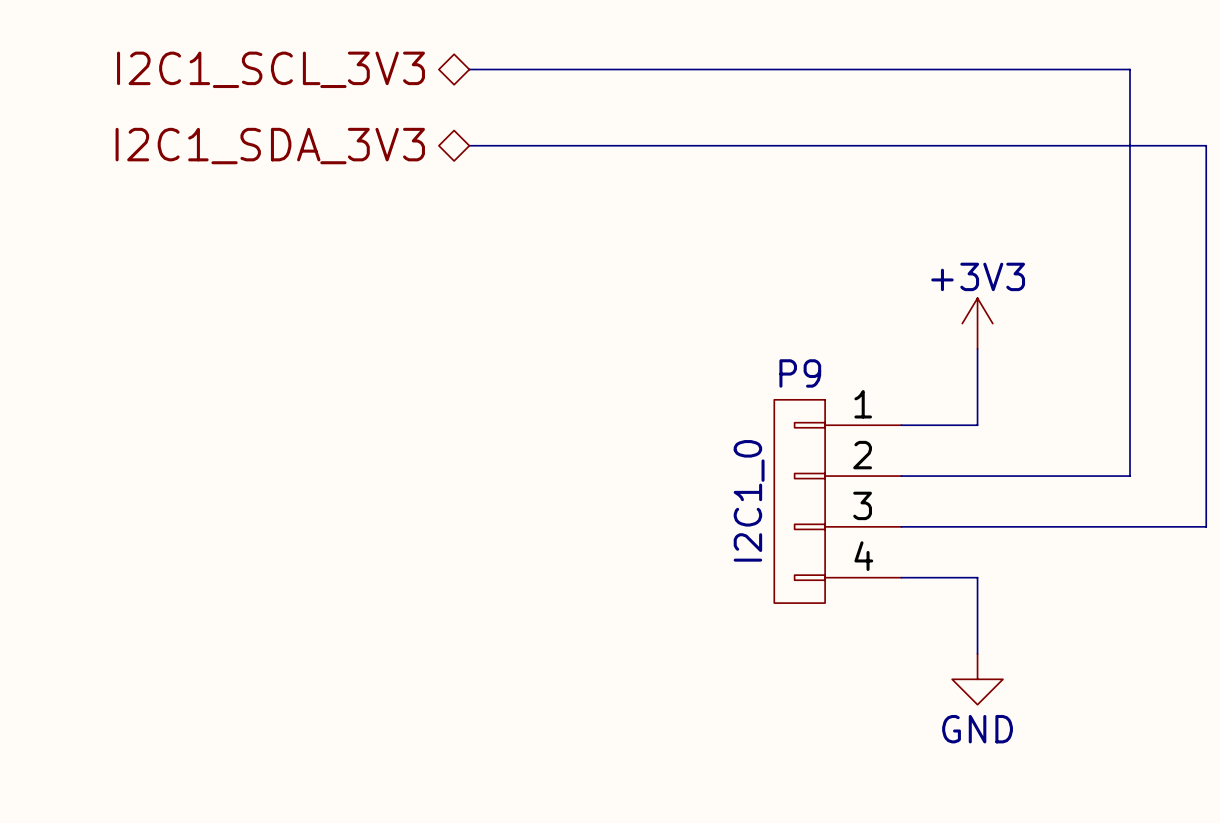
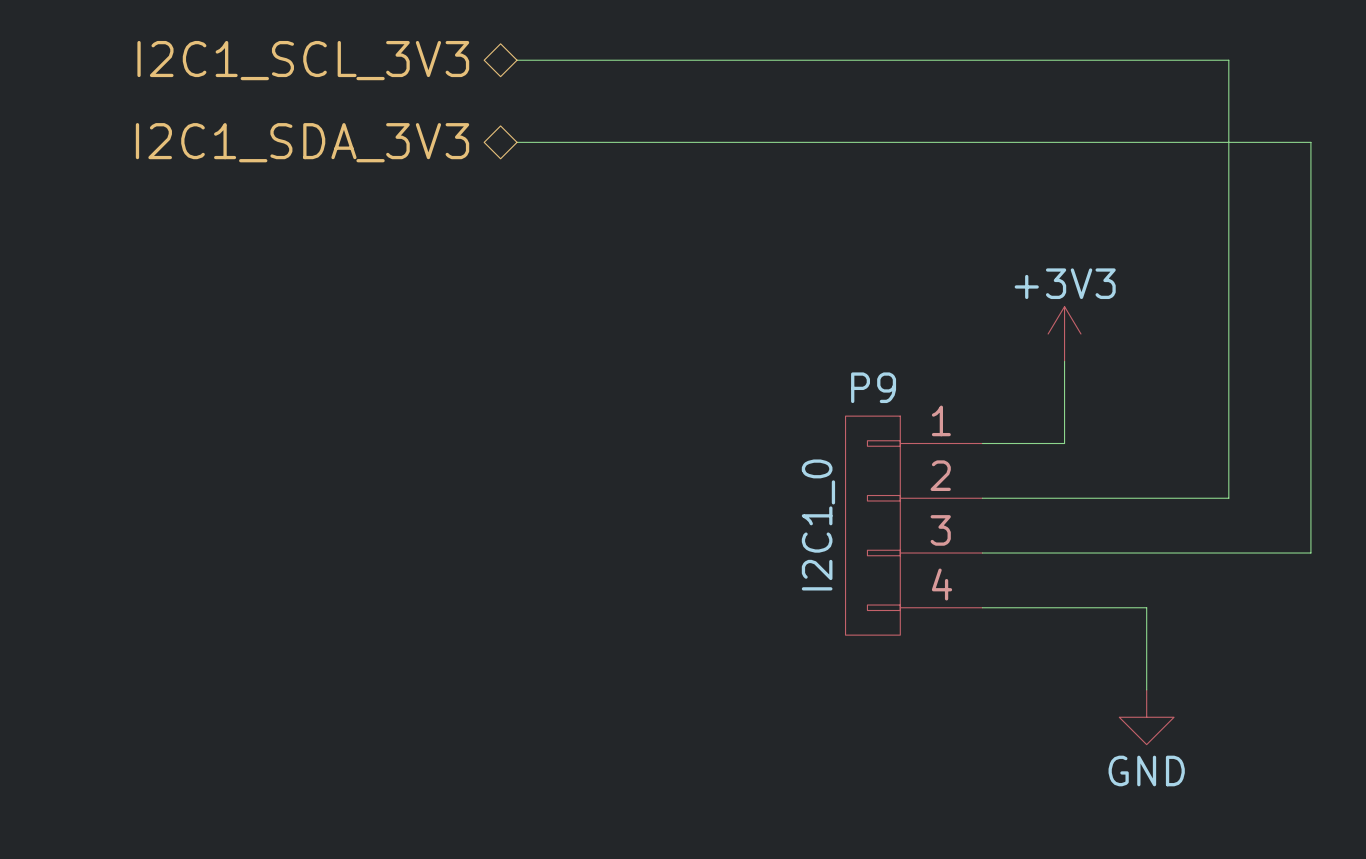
wire: (977, 577) (977, 653) -> (1064, 607) (1146, 607) (1146, 689)
power symbol position: GND (977, 679) -> GND (1146, 717)

